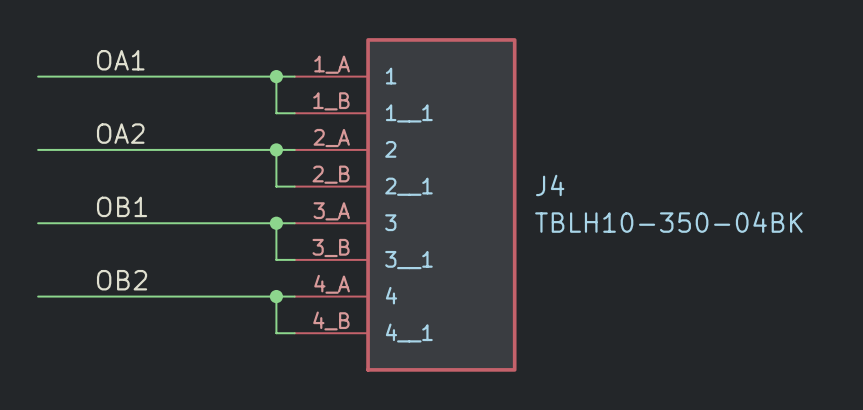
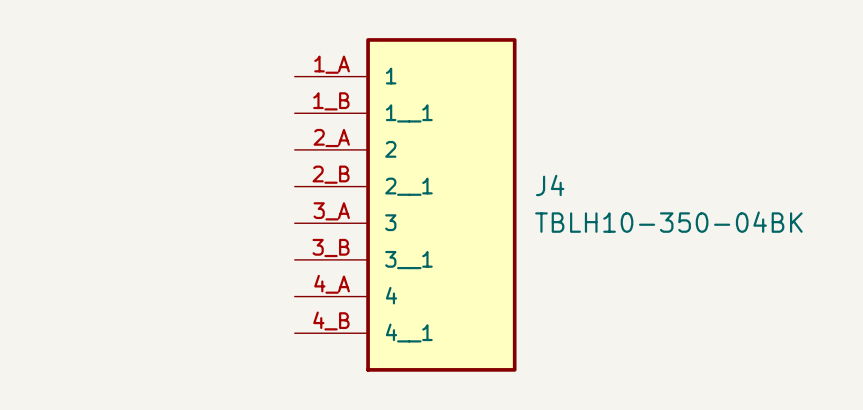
label: OA1 (120, 60) -> none
wire: (38, 76) (294, 76) -> none
wire: (276, 76) (276, 113) (294, 113) -> none
junction: (276, 76) -> none
label: OA2 (120, 133) -> none
wire: (38, 149) (294, 149) -> none
wire: (276, 149) (276, 186) (294, 186) -> none
junction: (276, 149) -> none
label: OB1 (122, 206) -> none
wire: (38, 223) (294, 223) -> none
wire: (276, 223) (276, 259) (294, 259) -> none
junction: (276, 223) -> none
label: OB2 (122, 280) -> none
wire: (38, 296) (294, 296) -> none
wire: (276, 296) (276, 333) (294, 333) -> none
junction: (276, 296) -> none

